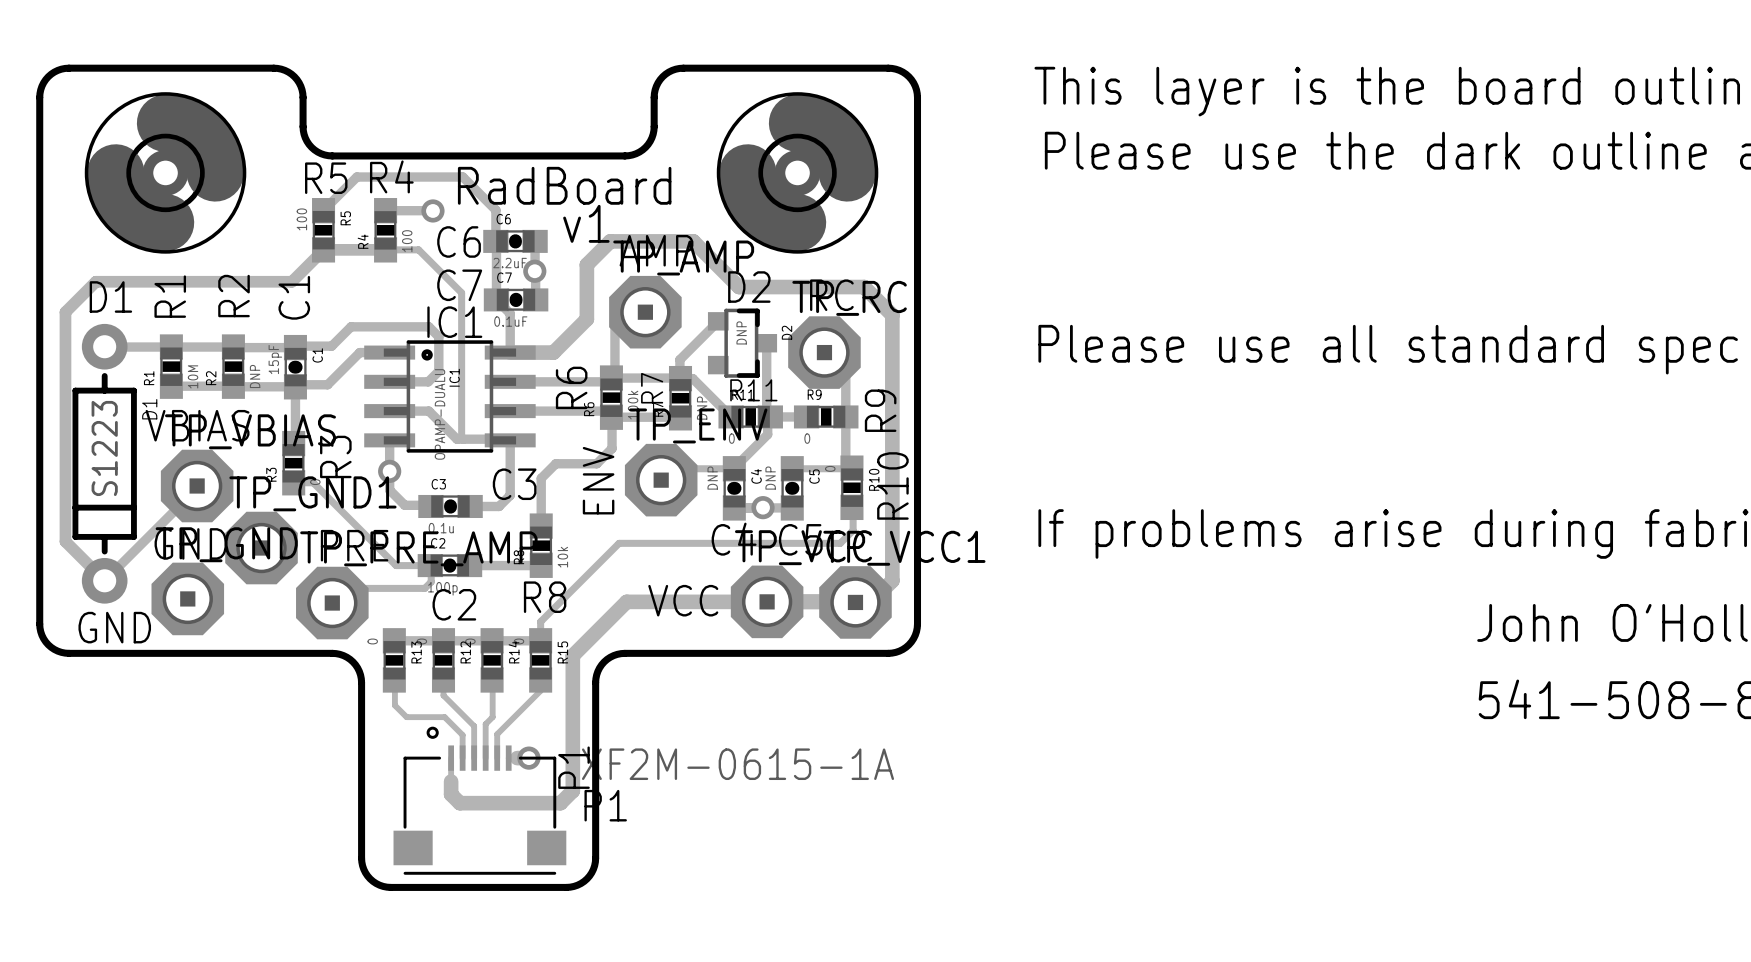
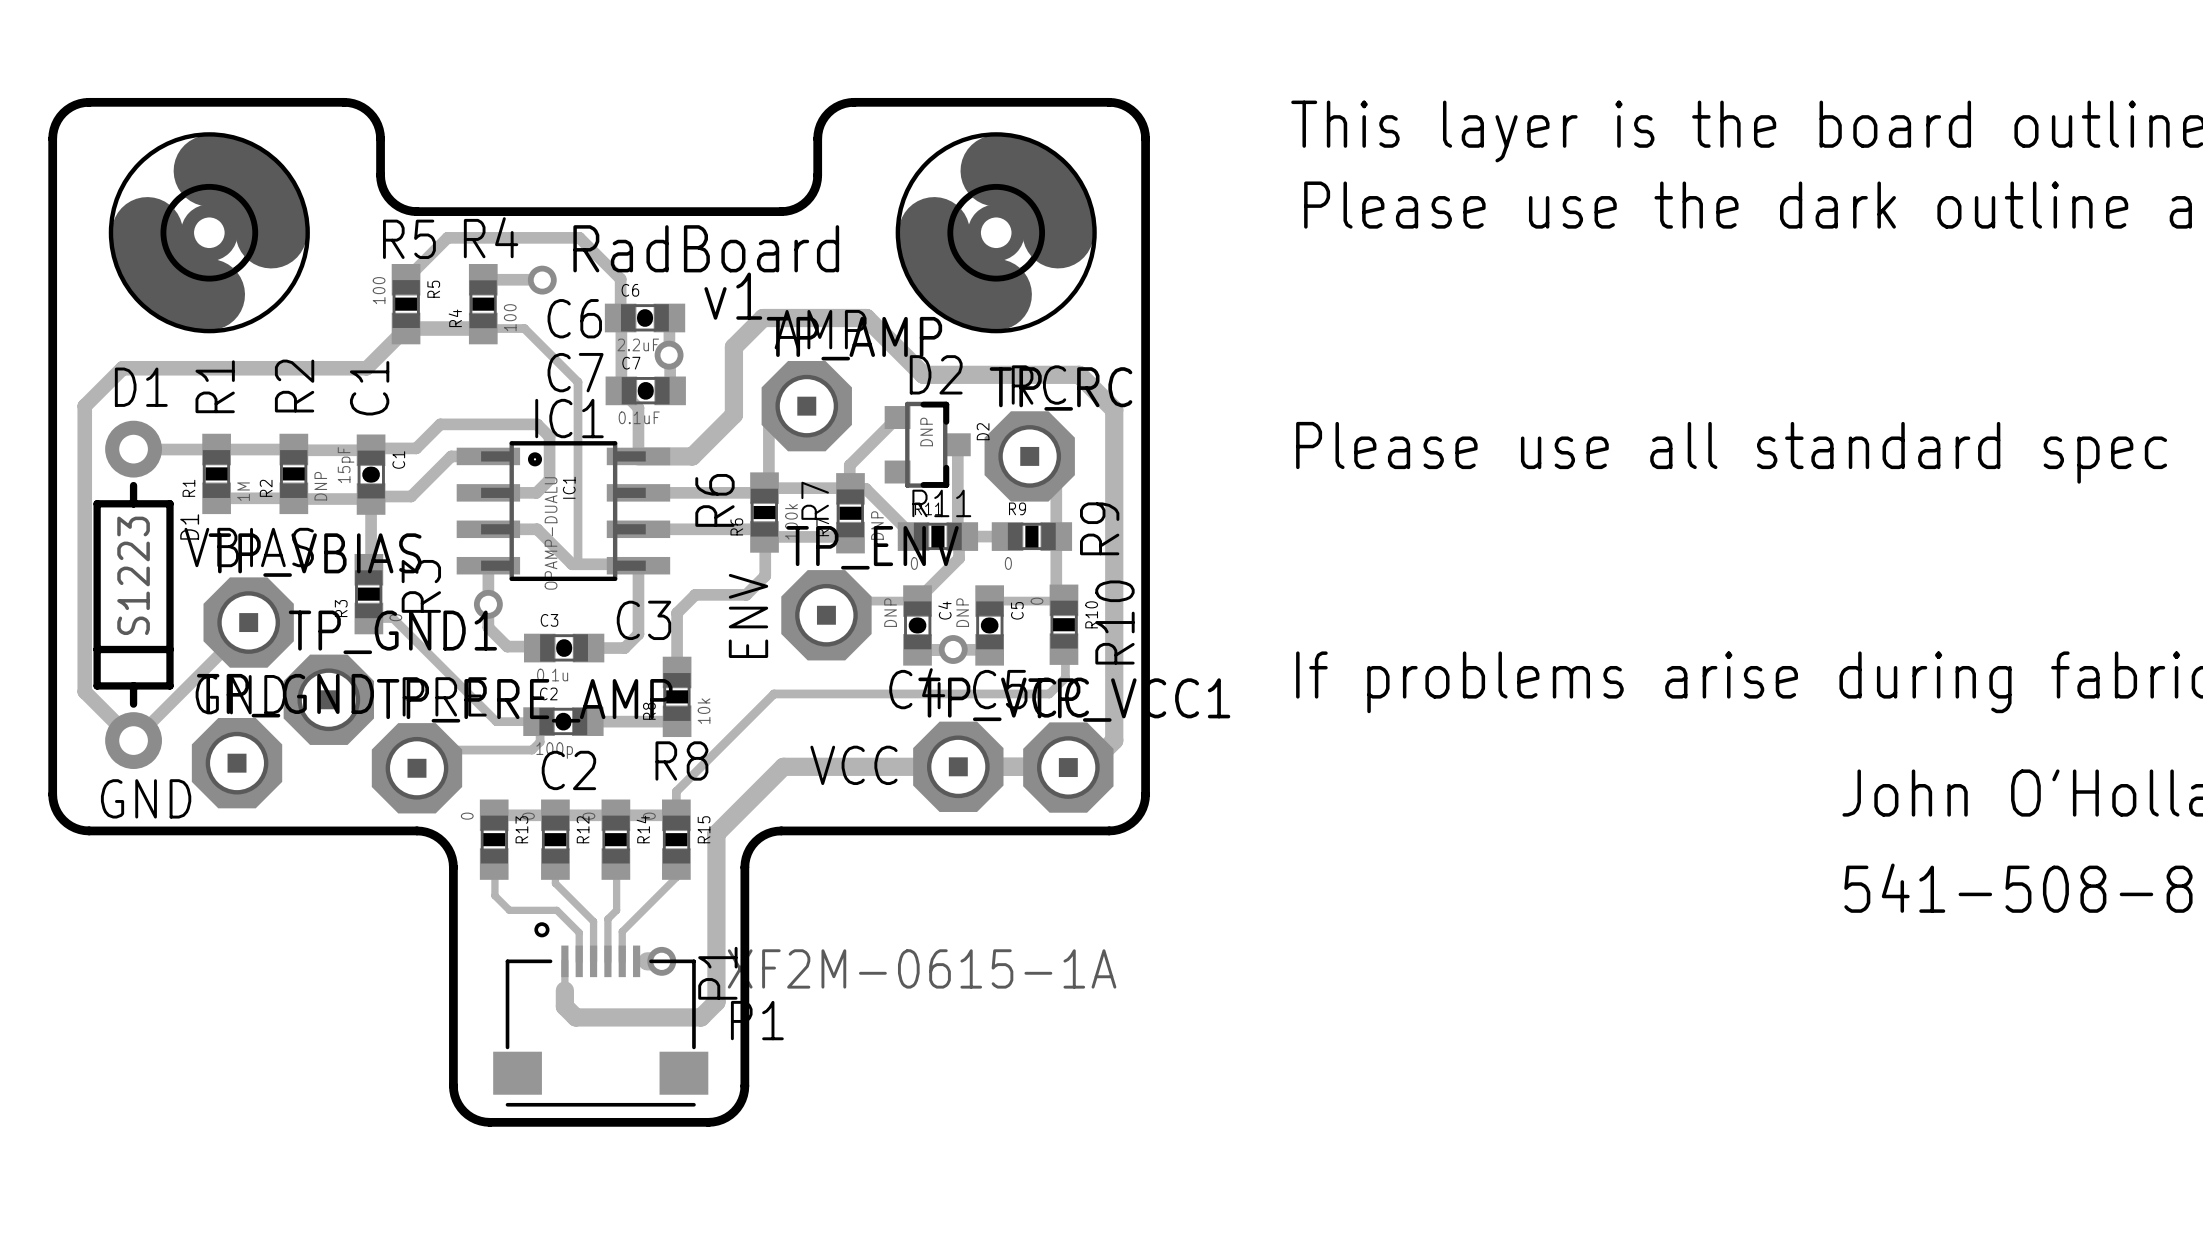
R1 value: 10M (193, 376) -> 1M (243, 491)

